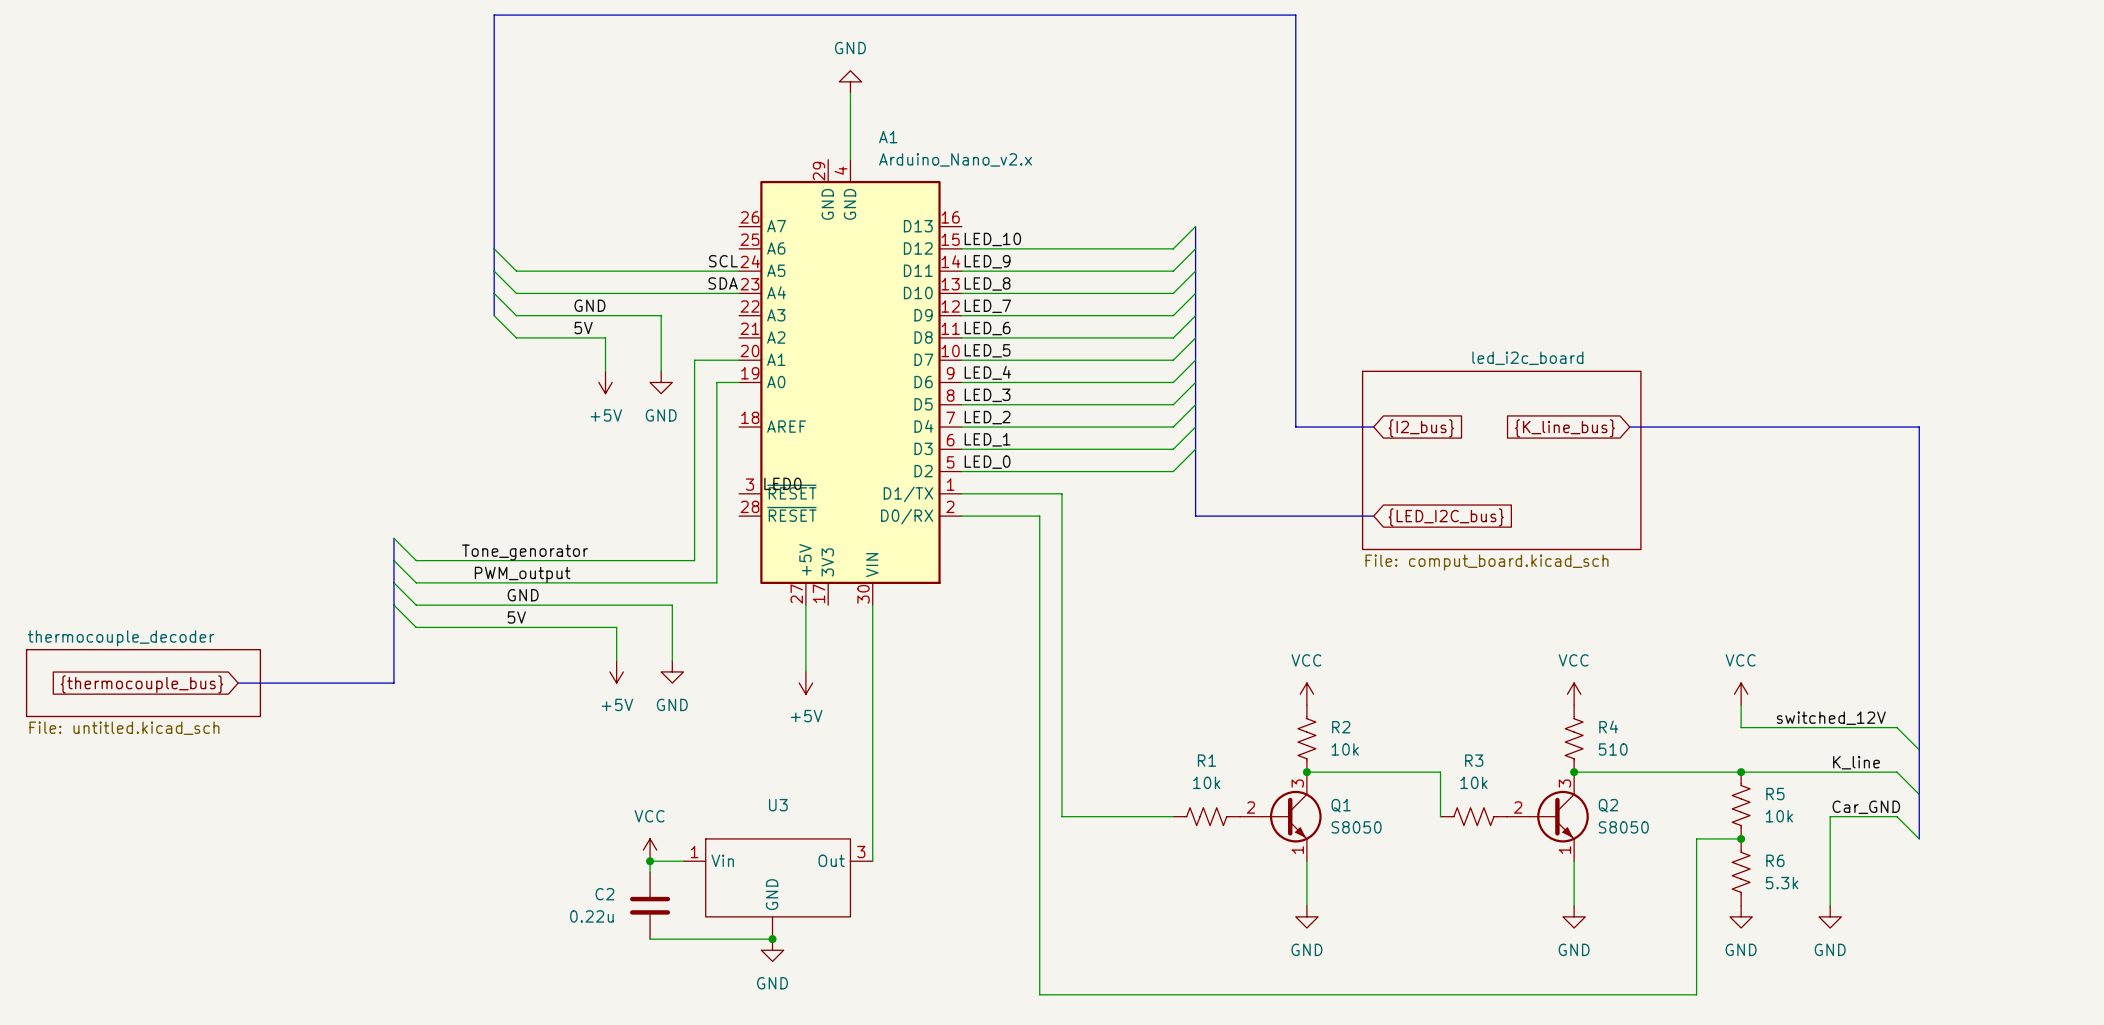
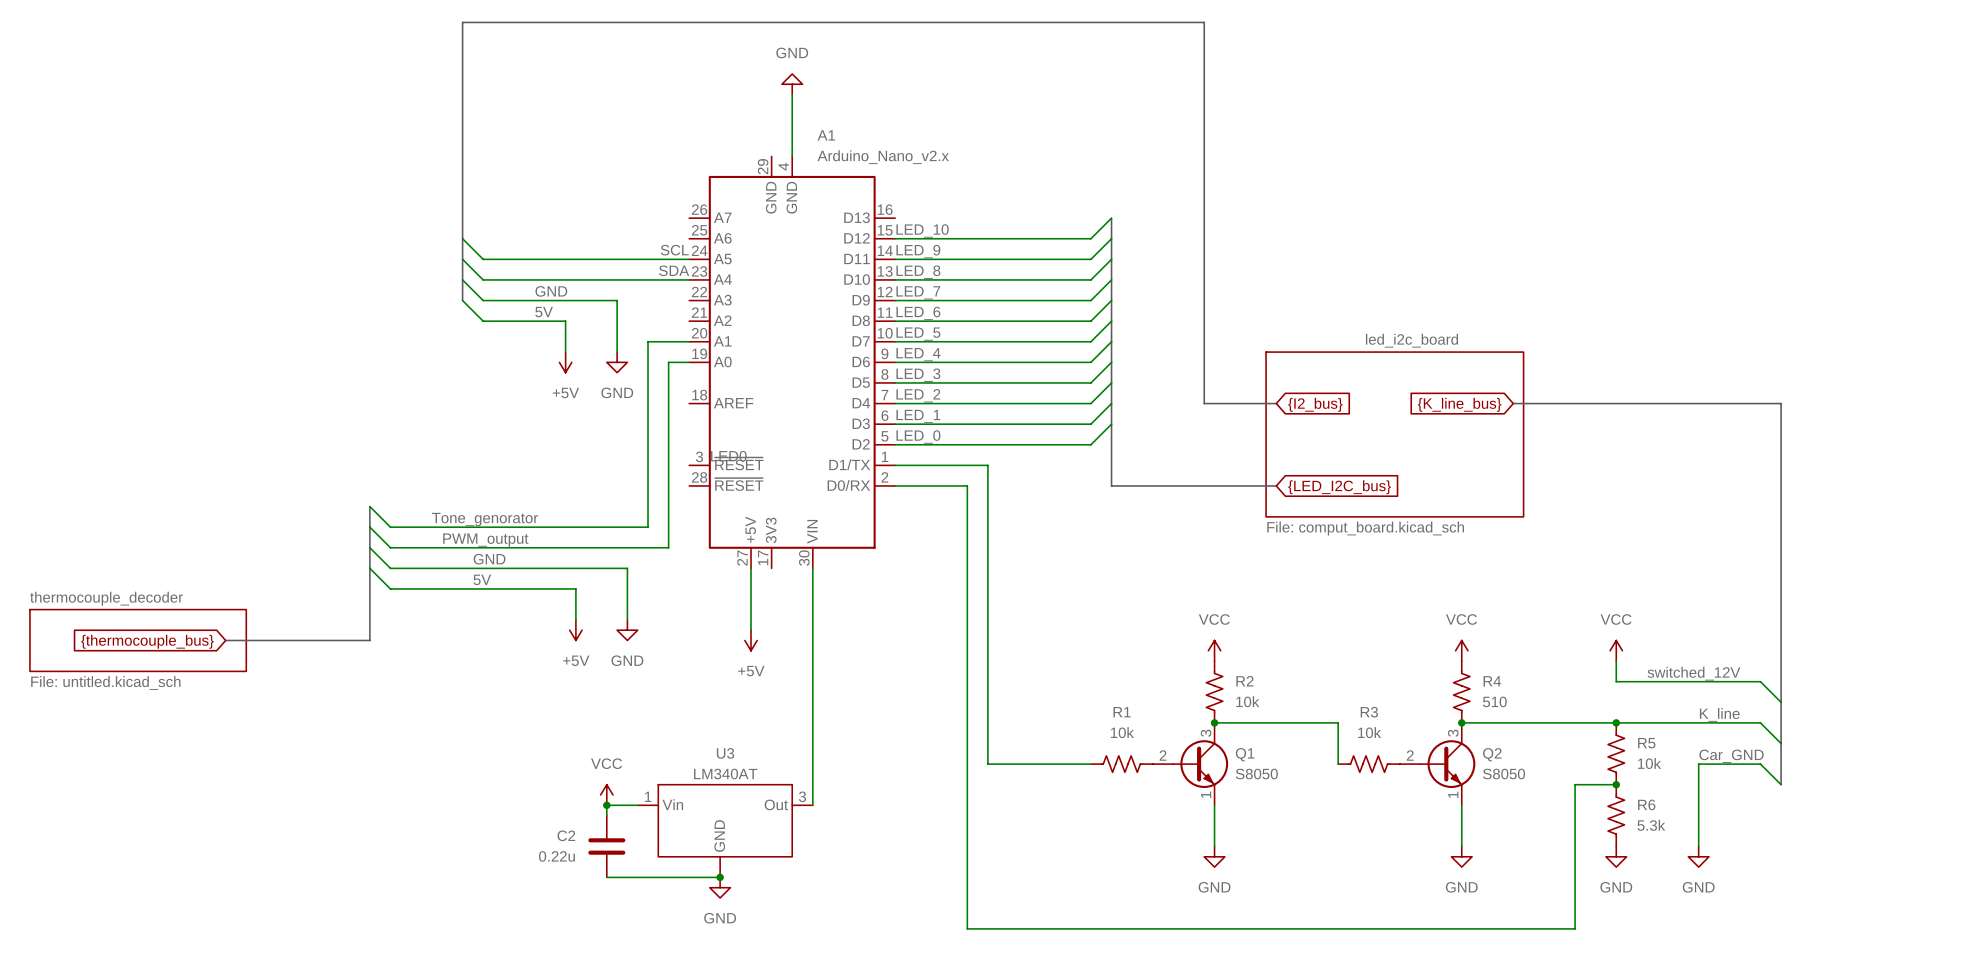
U3 value: none -> LM340AT (725, 774)

